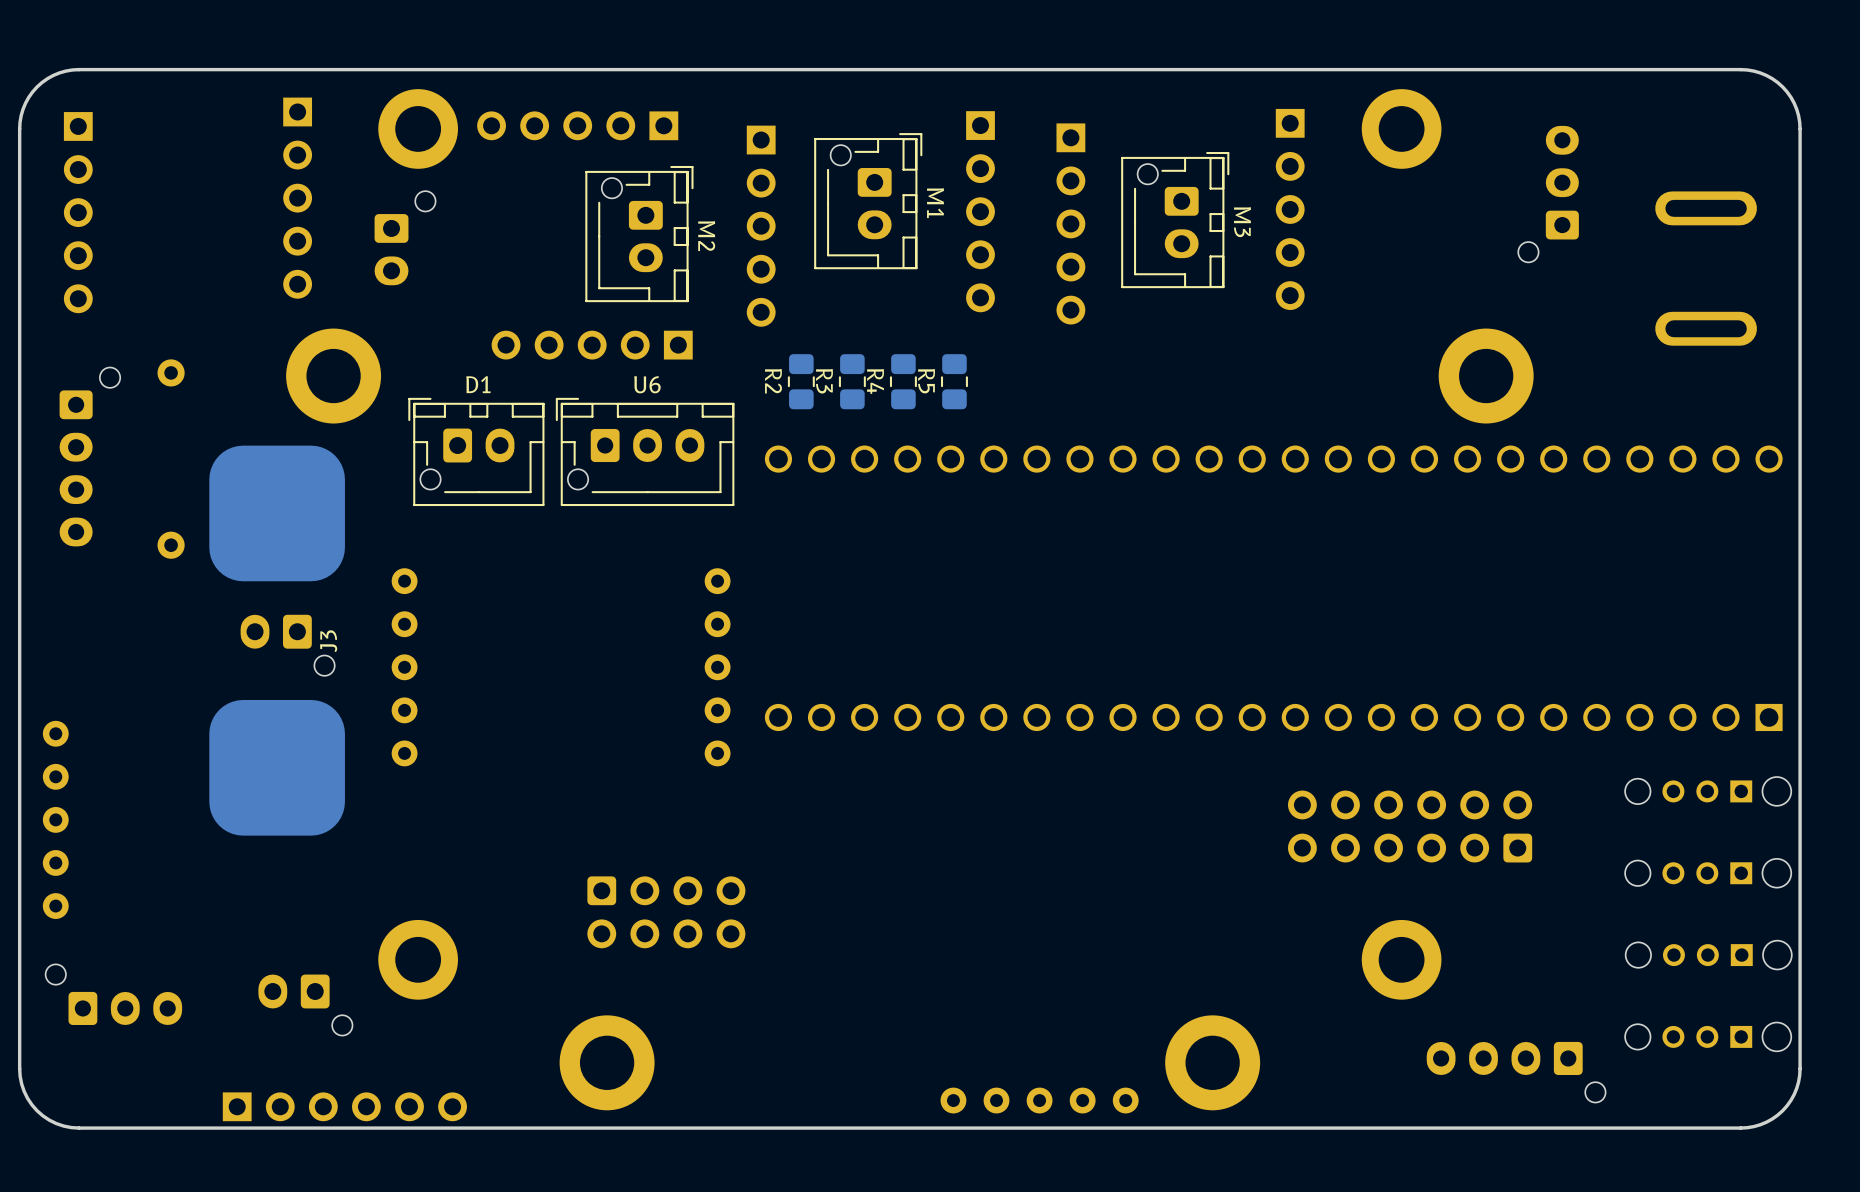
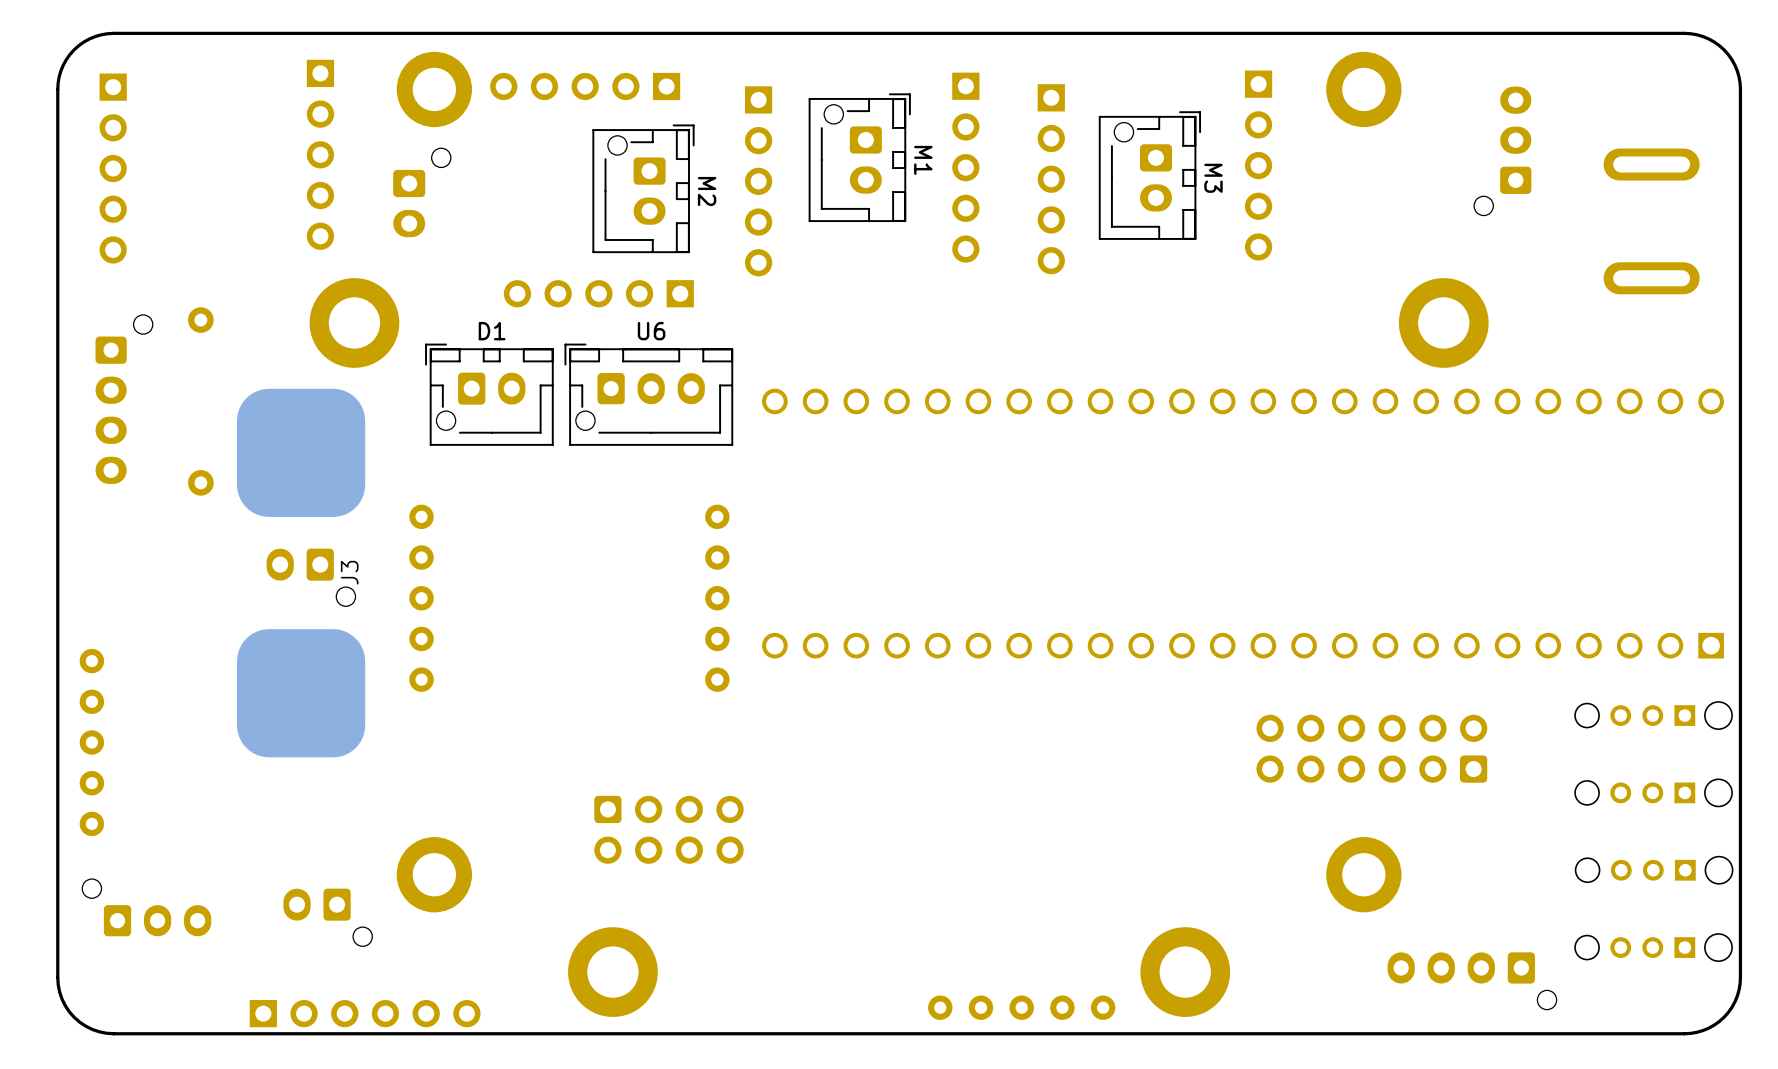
R2: (801, 381) -> none
R3: (852, 381) -> none
R4: (903, 381) -> none
R5: (954, 381) -> none

